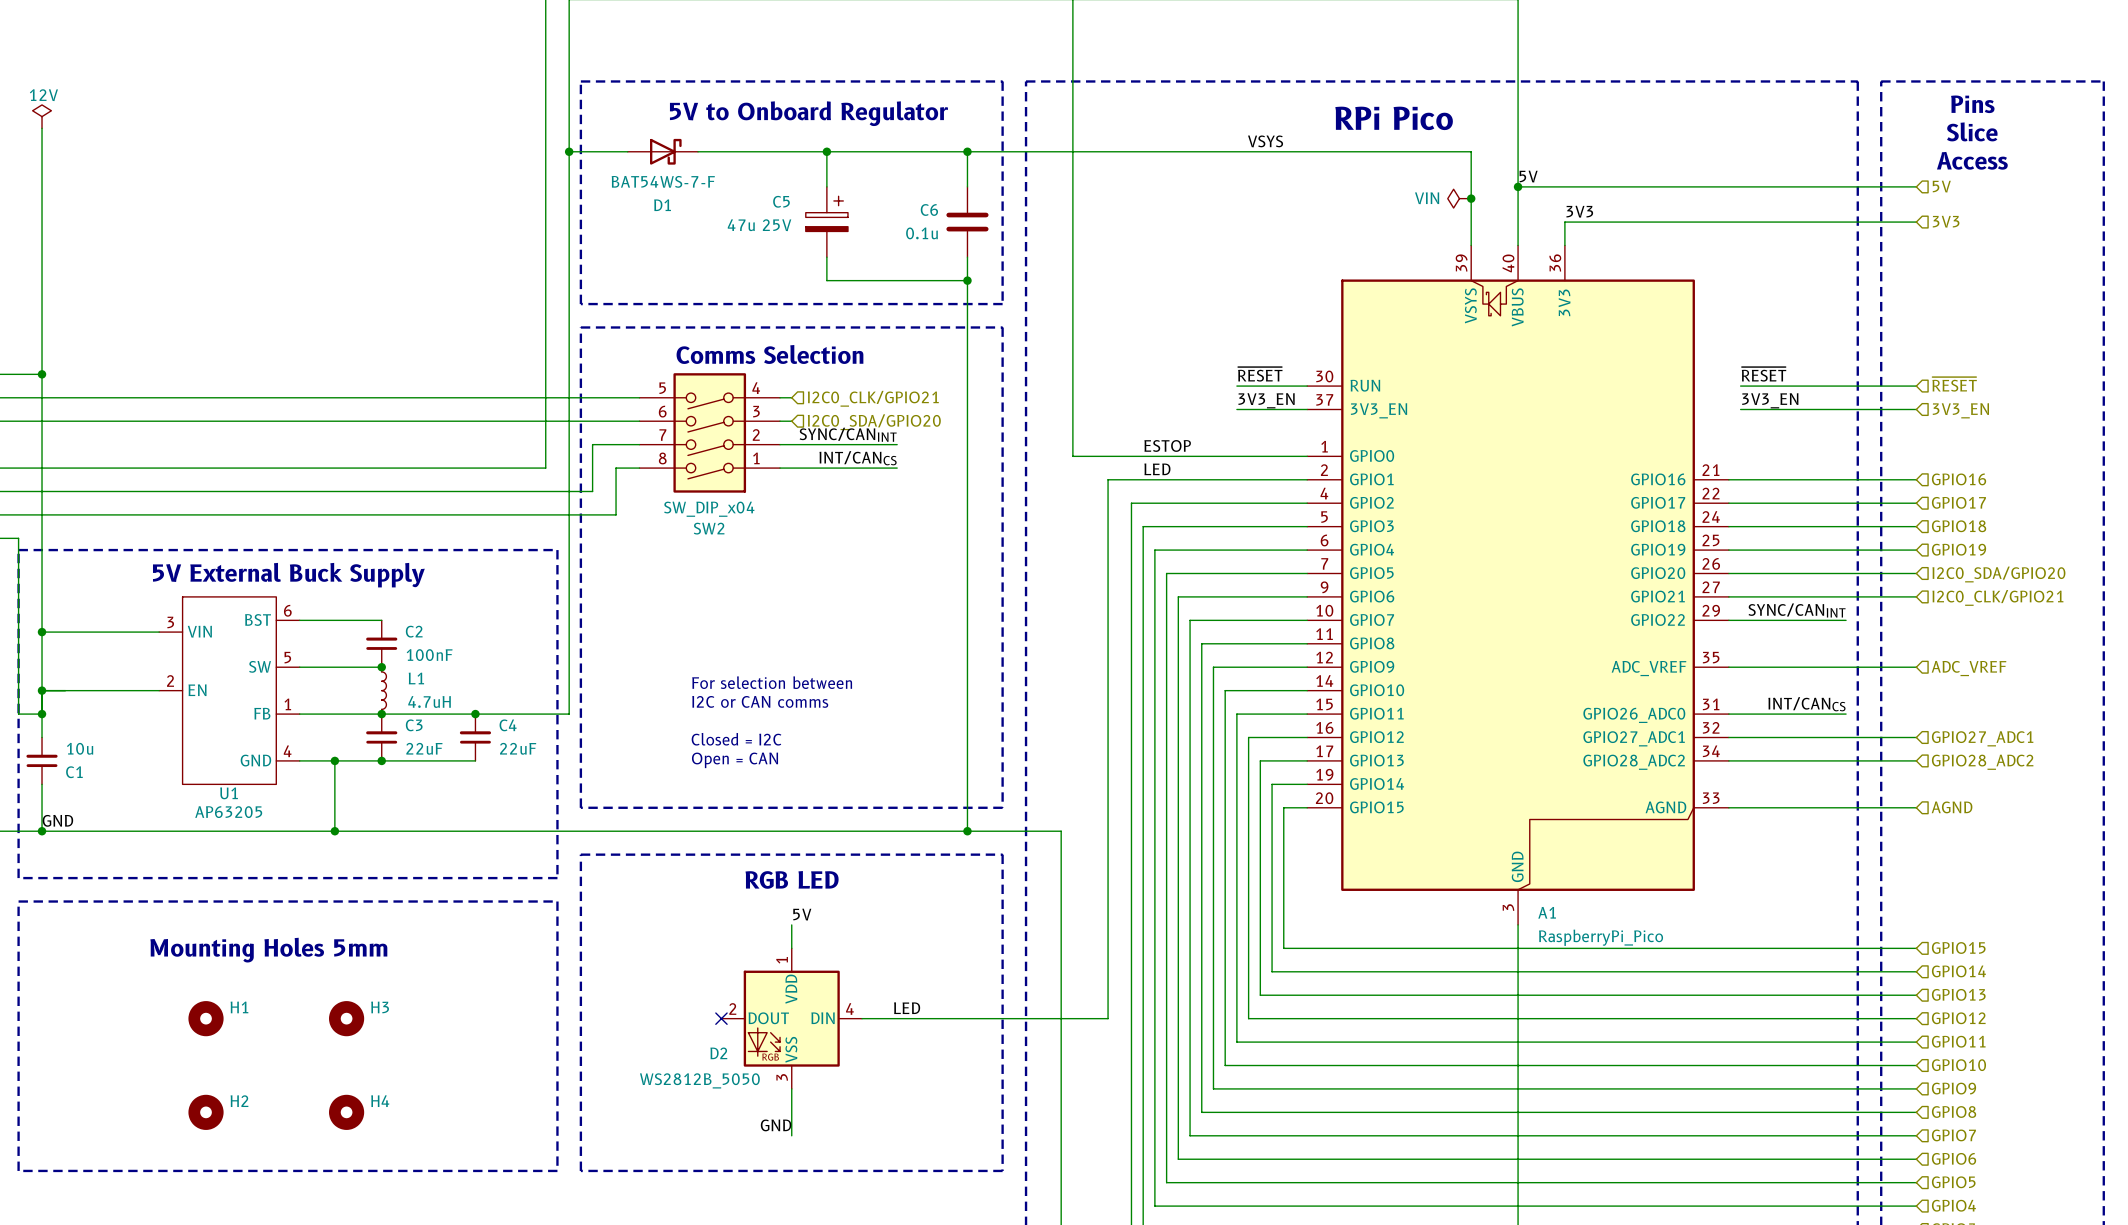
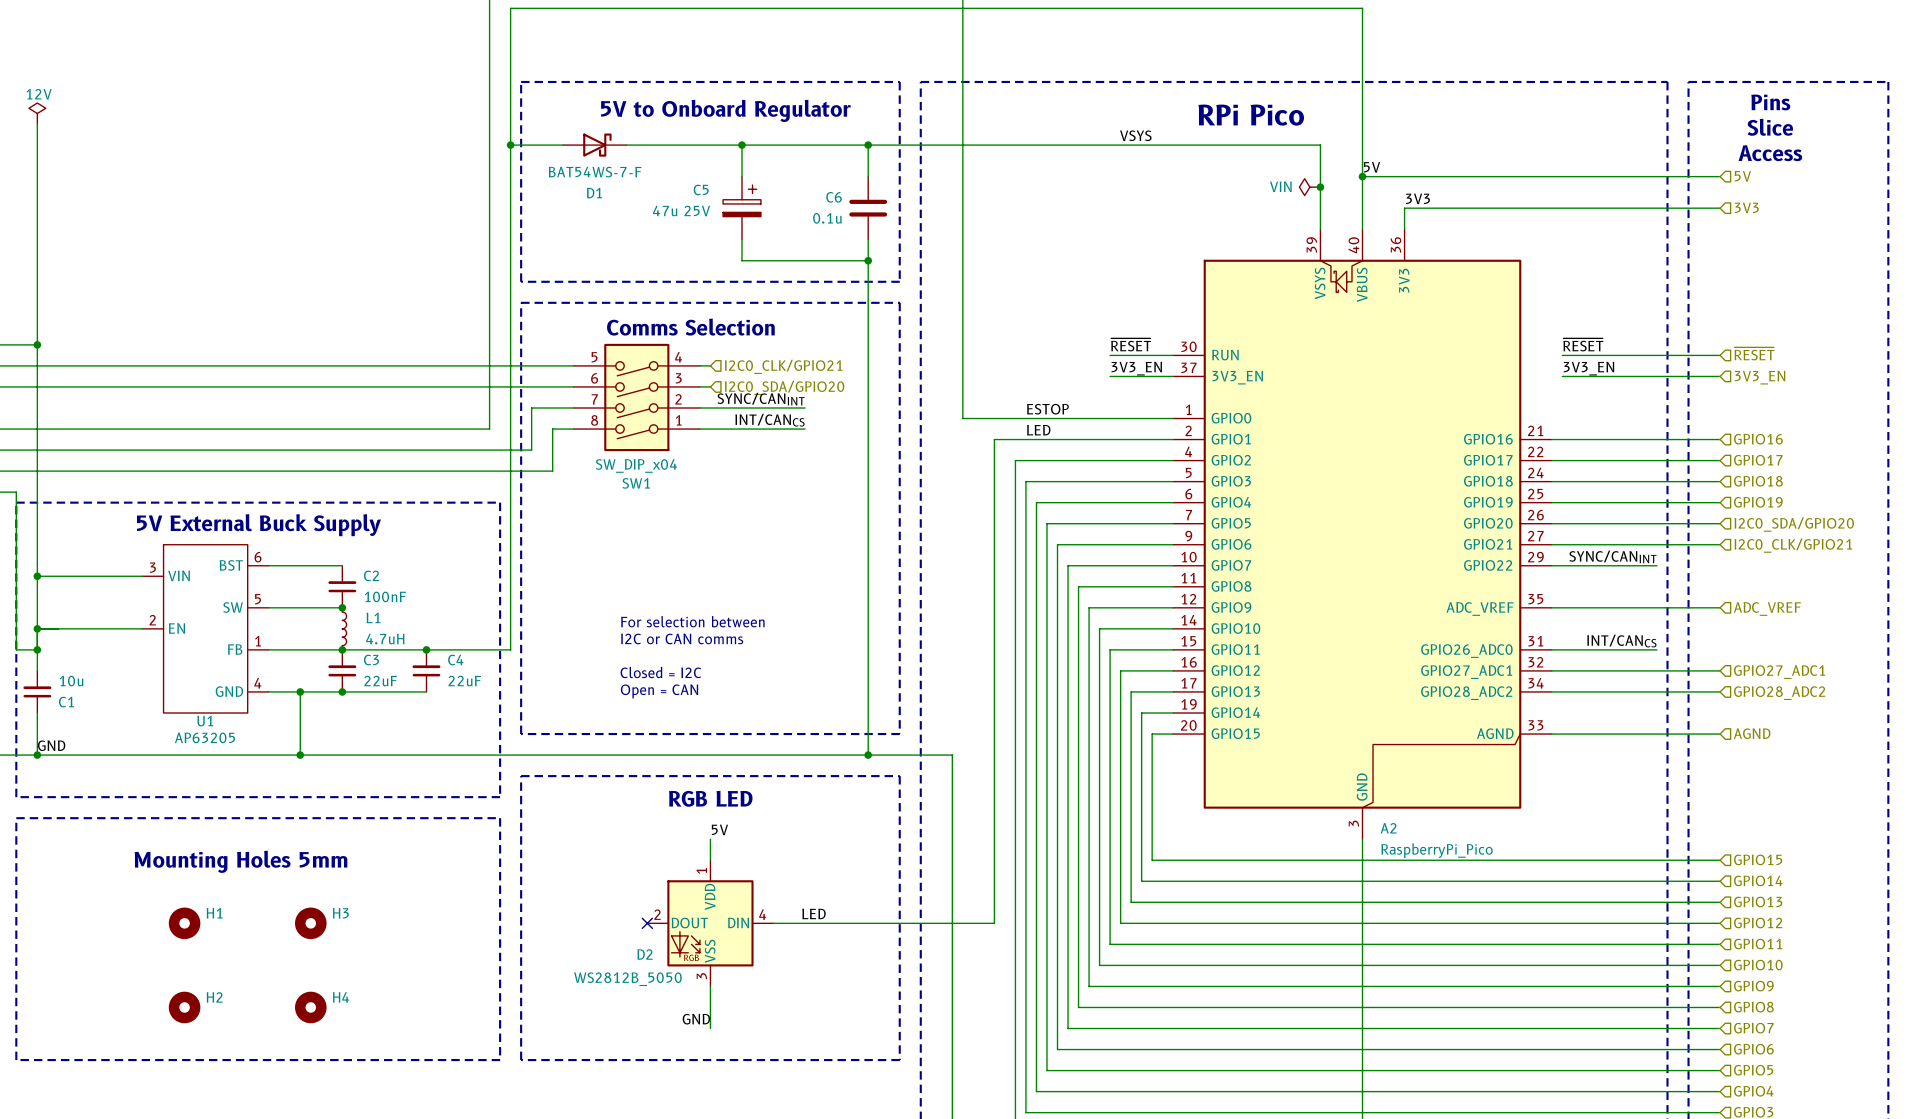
SW2 name: SW2 (709, 528) -> SW1 (636, 483)
A1 name: A1 (1547, 912) -> A2 (1388, 828)

